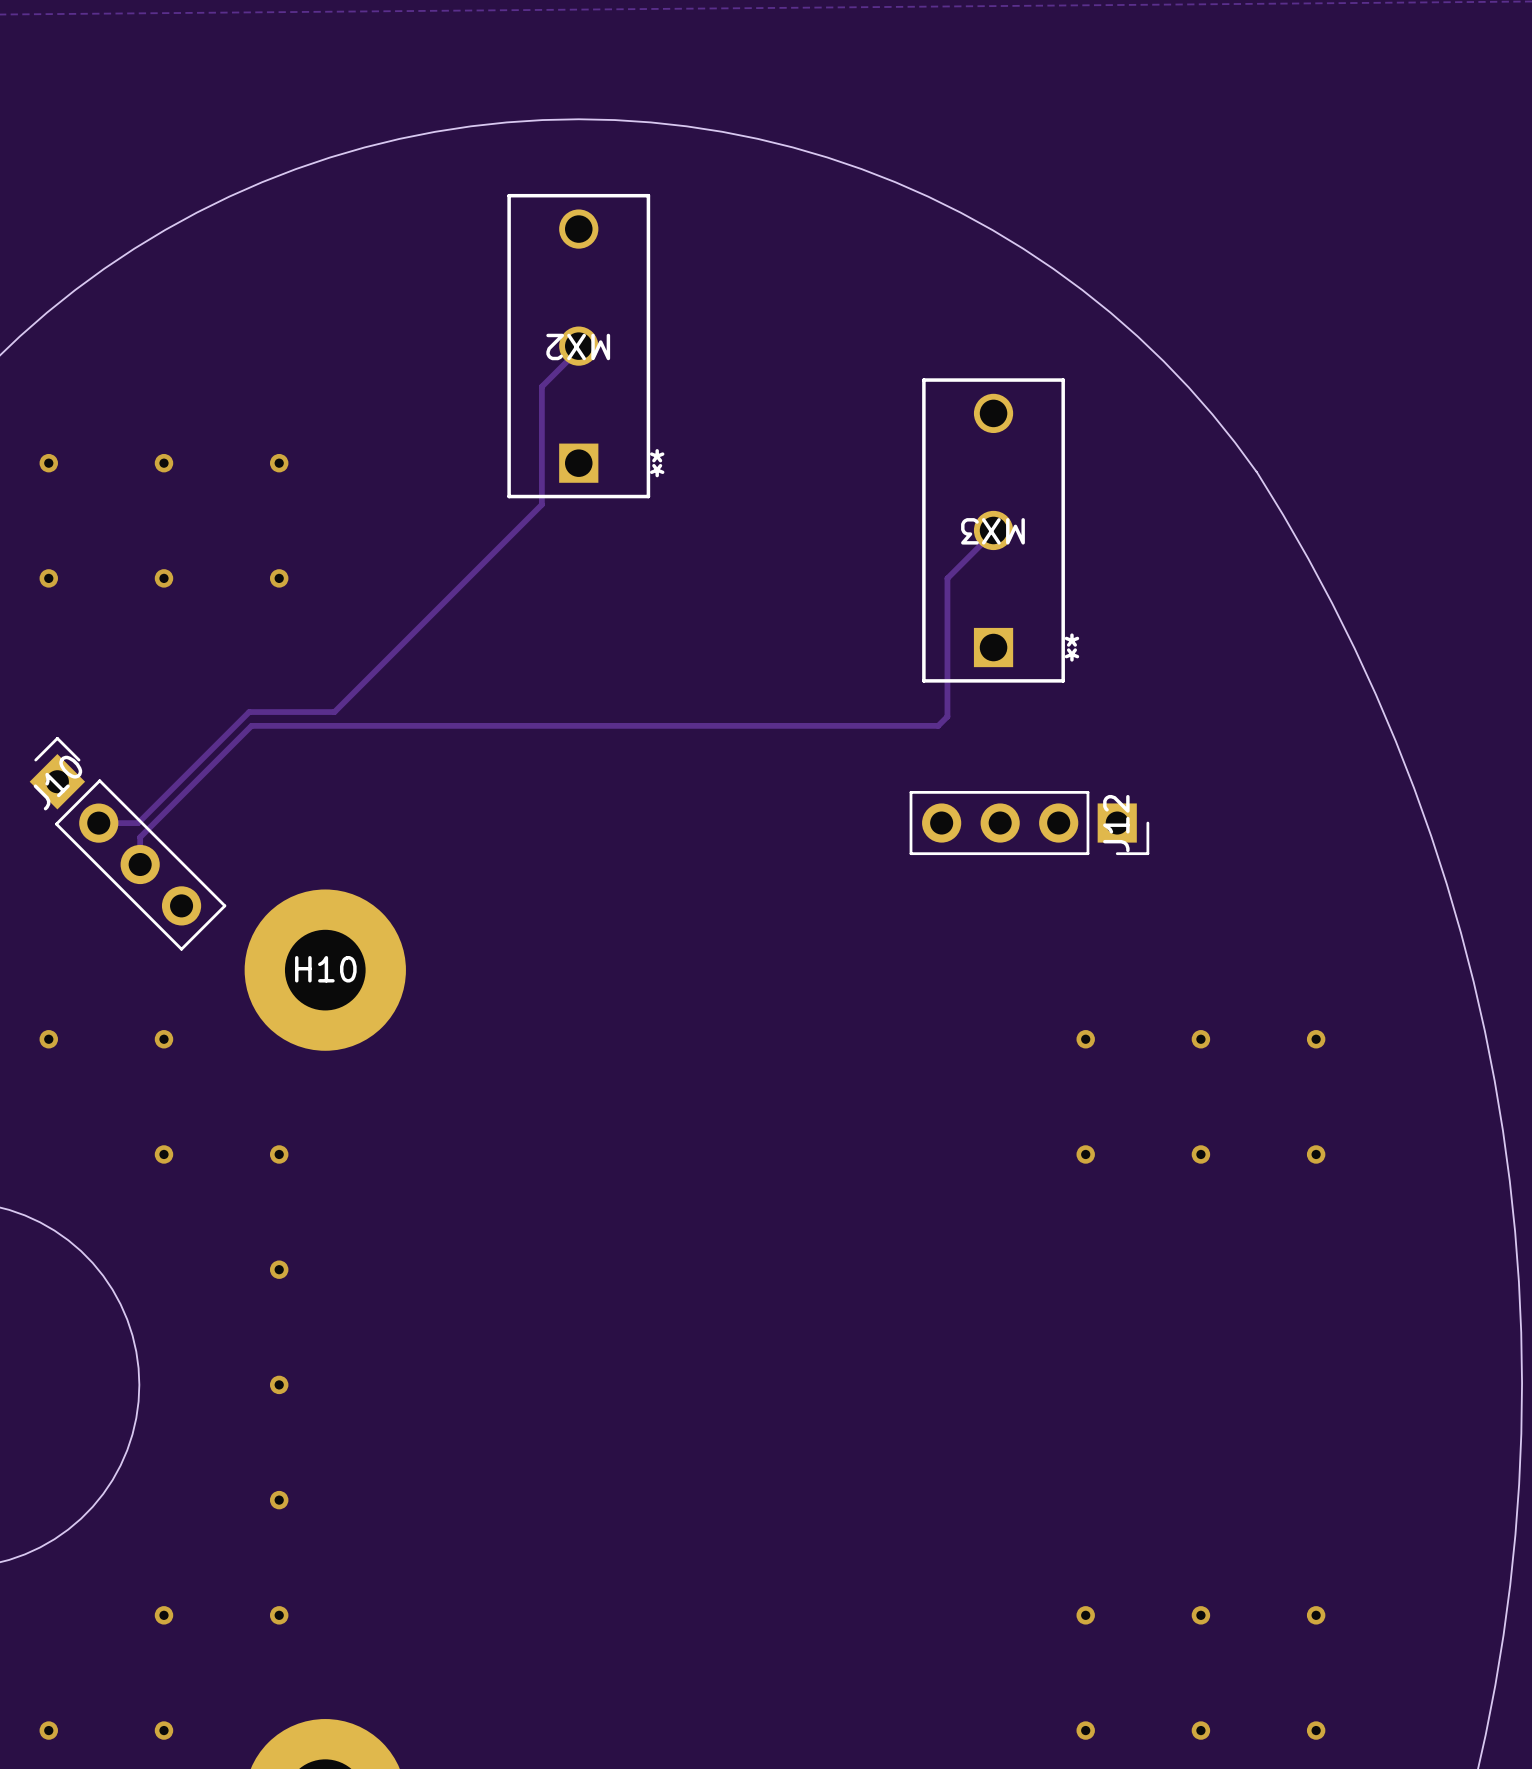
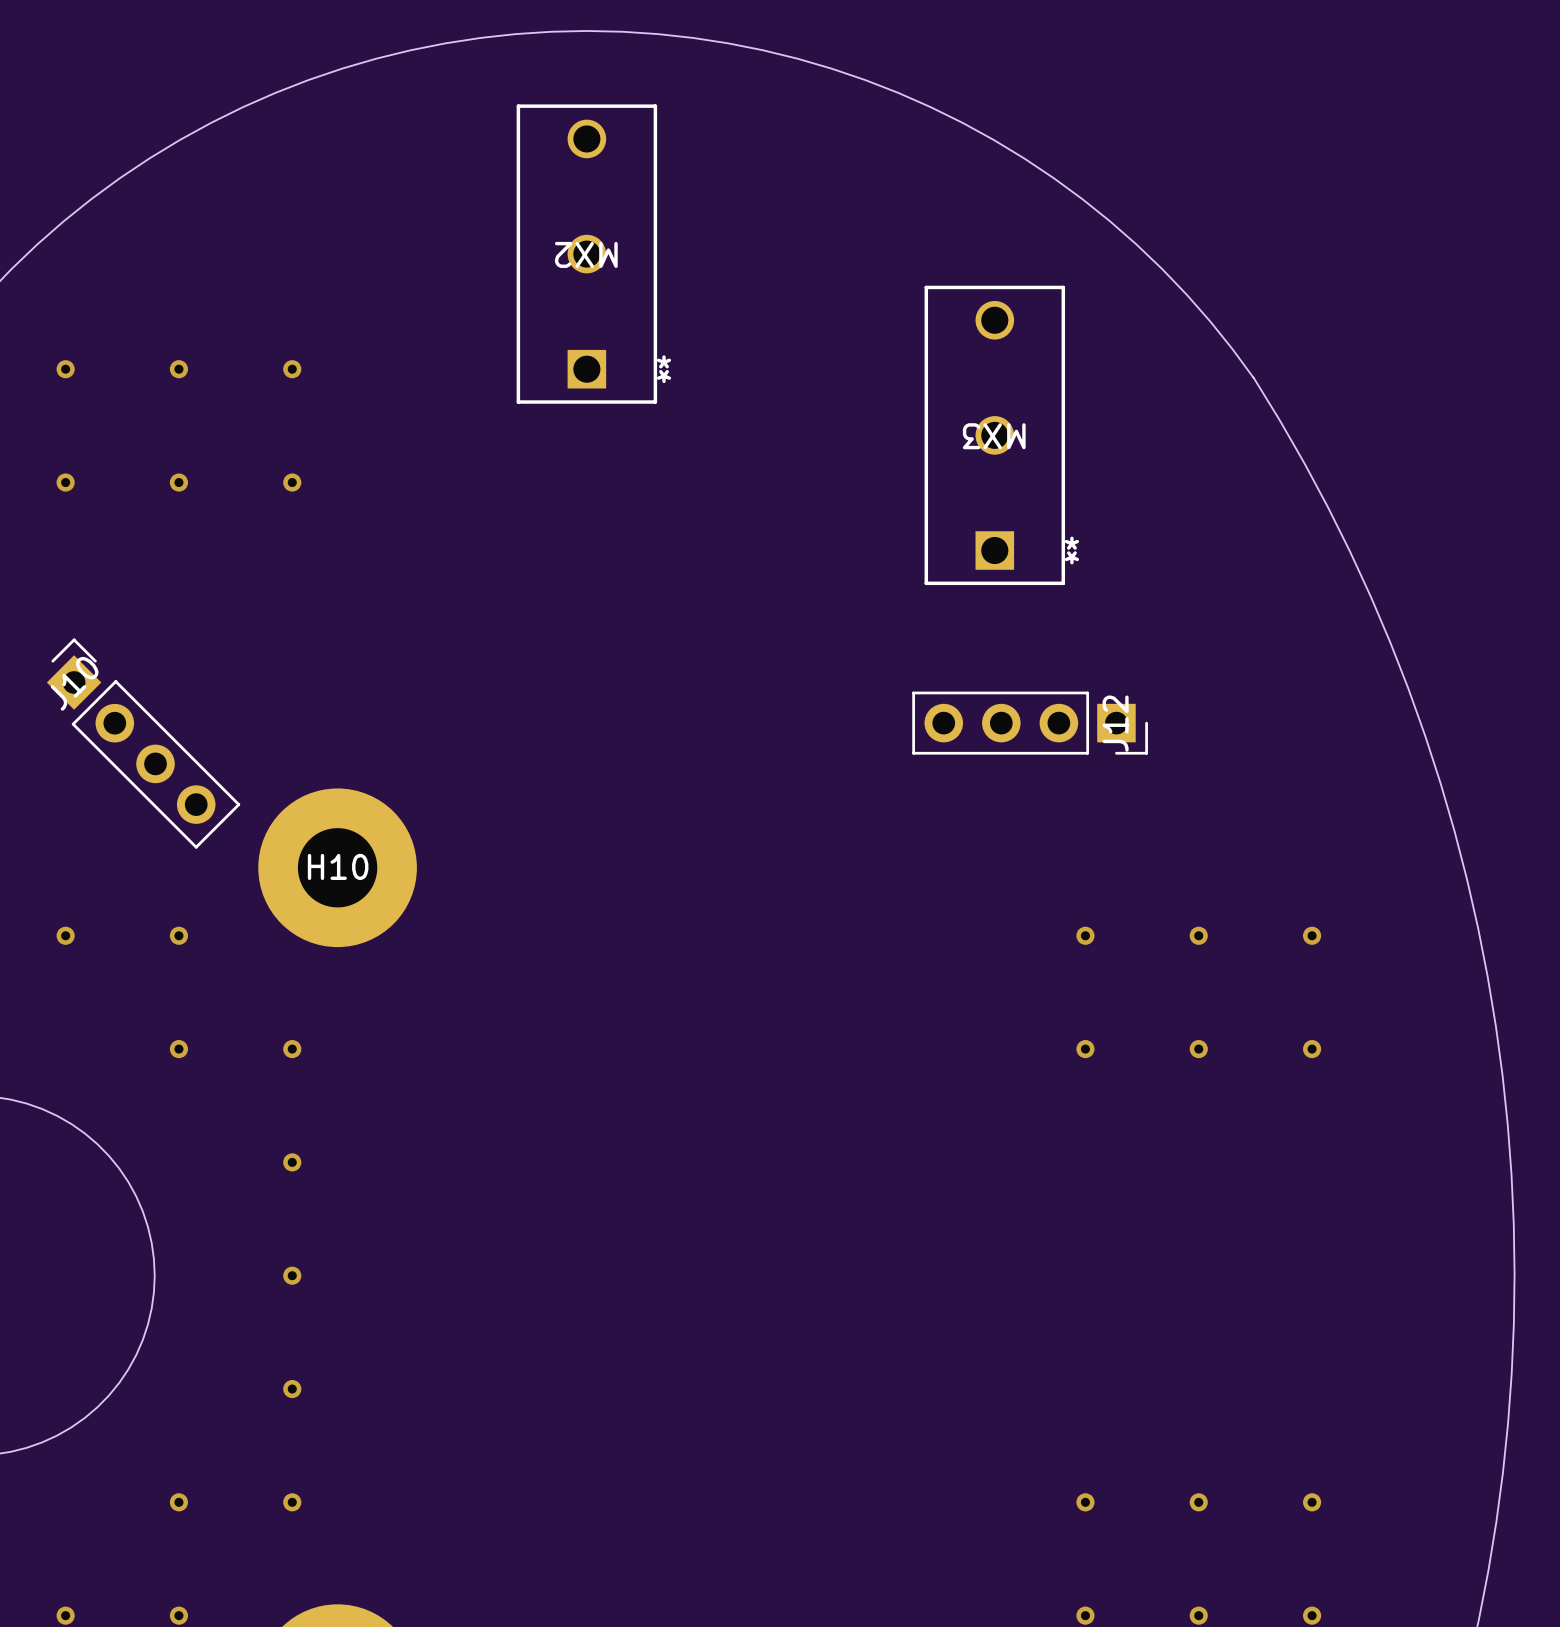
track: (578, 349) (541, 386) (541, 504) (334, 712) (249, 712) (138, 823) (98, 823) -> none
track: (991, 534) (947, 578) (947, 716) (938, 725) (251, 725) (140, 837) (140, 864) -> none

